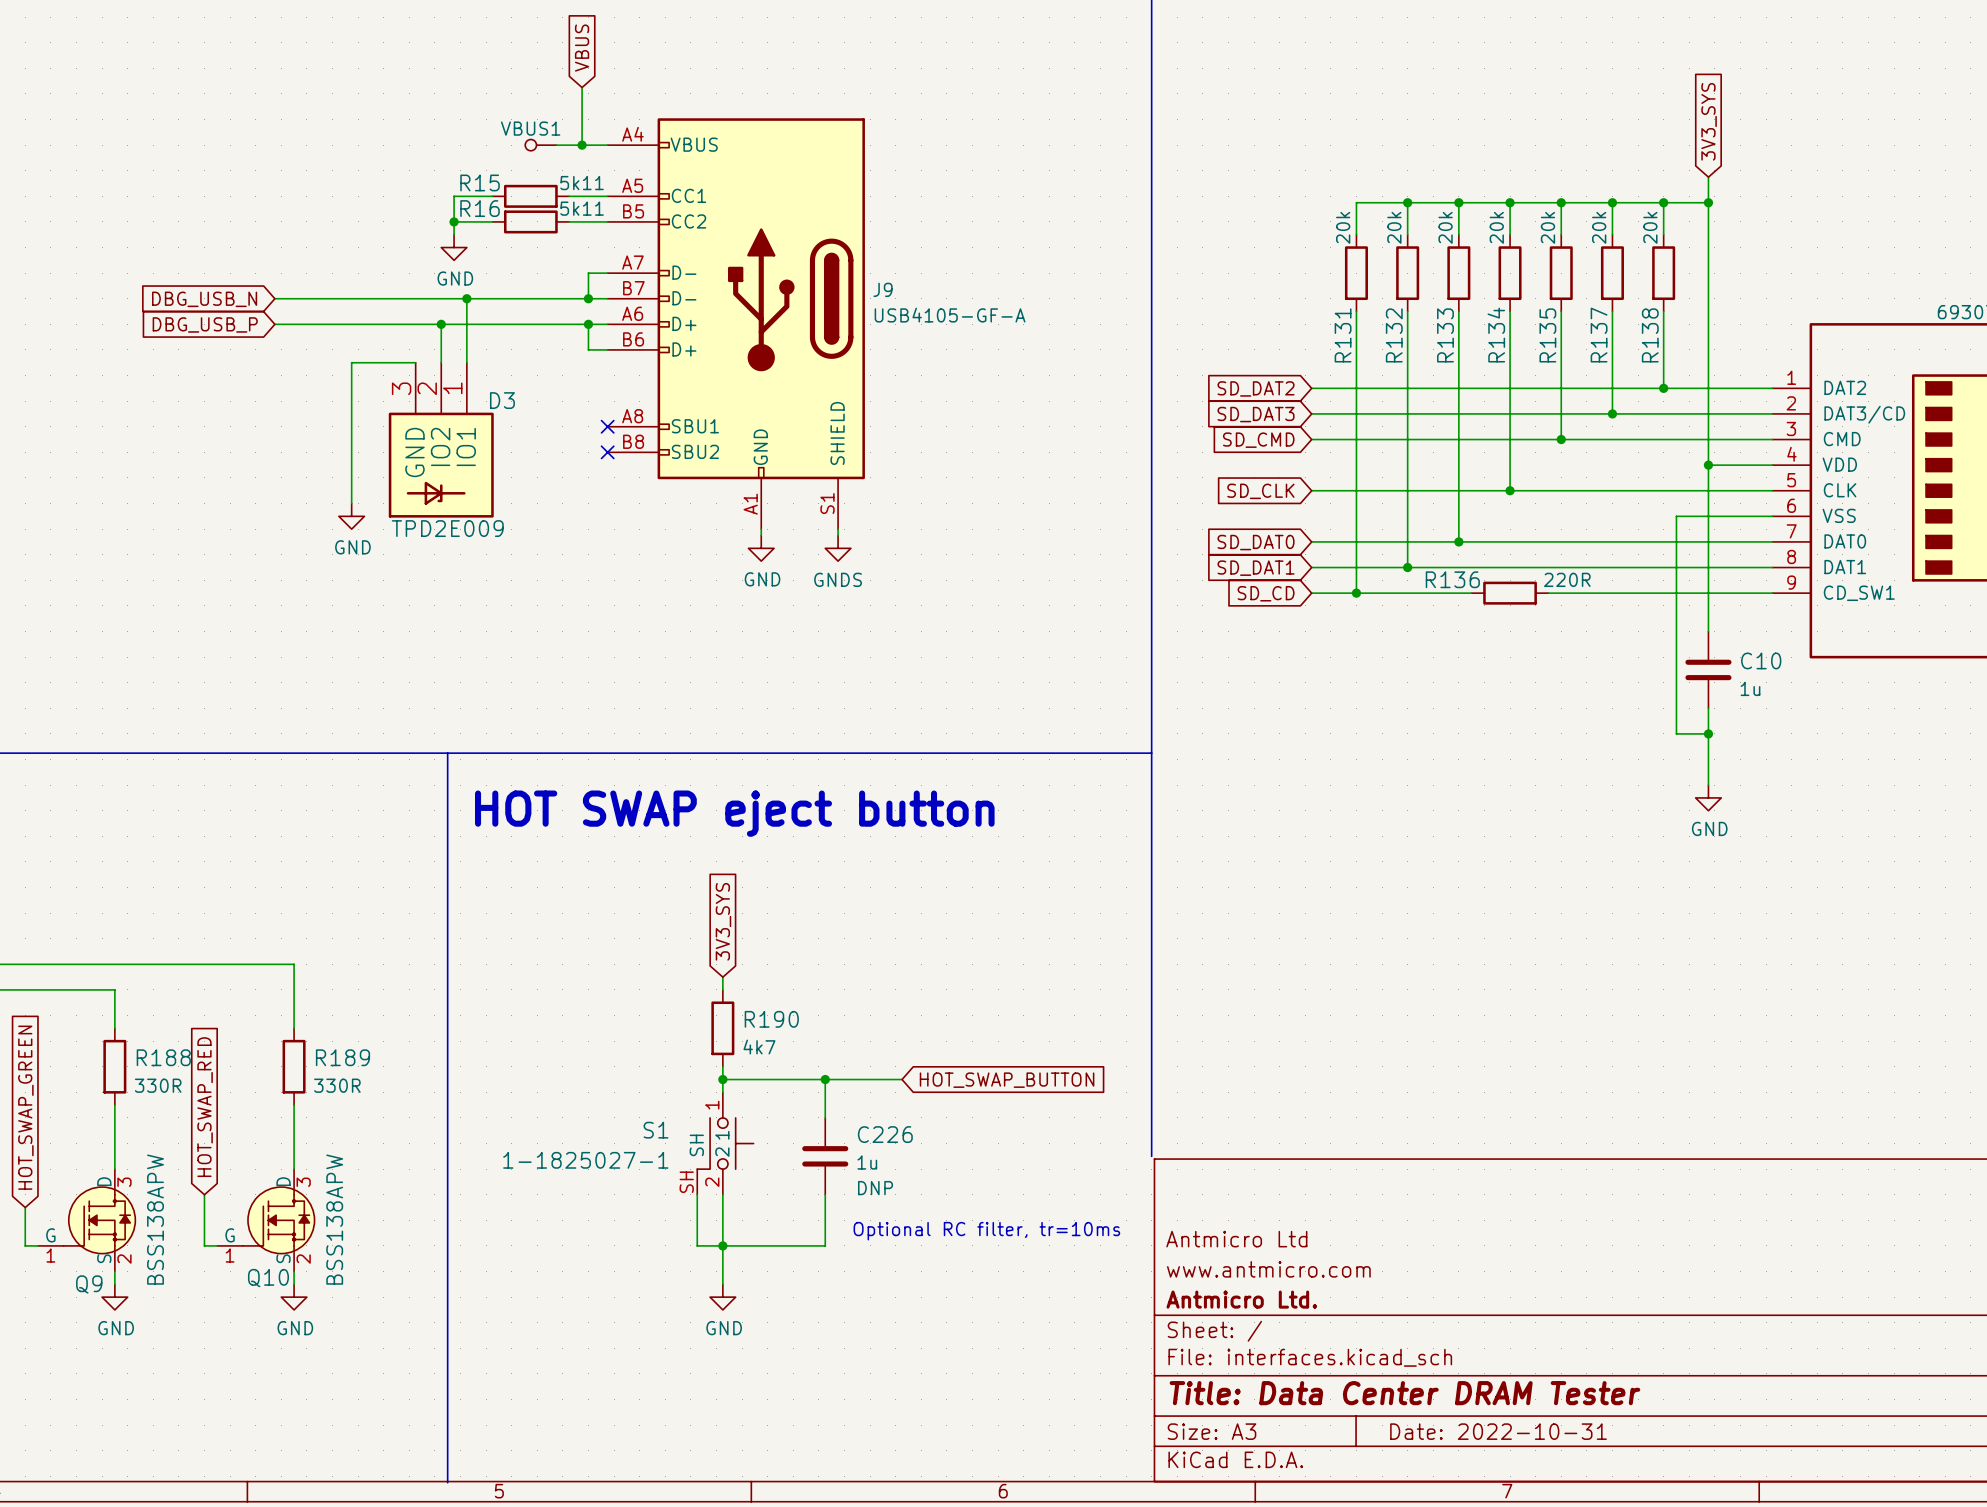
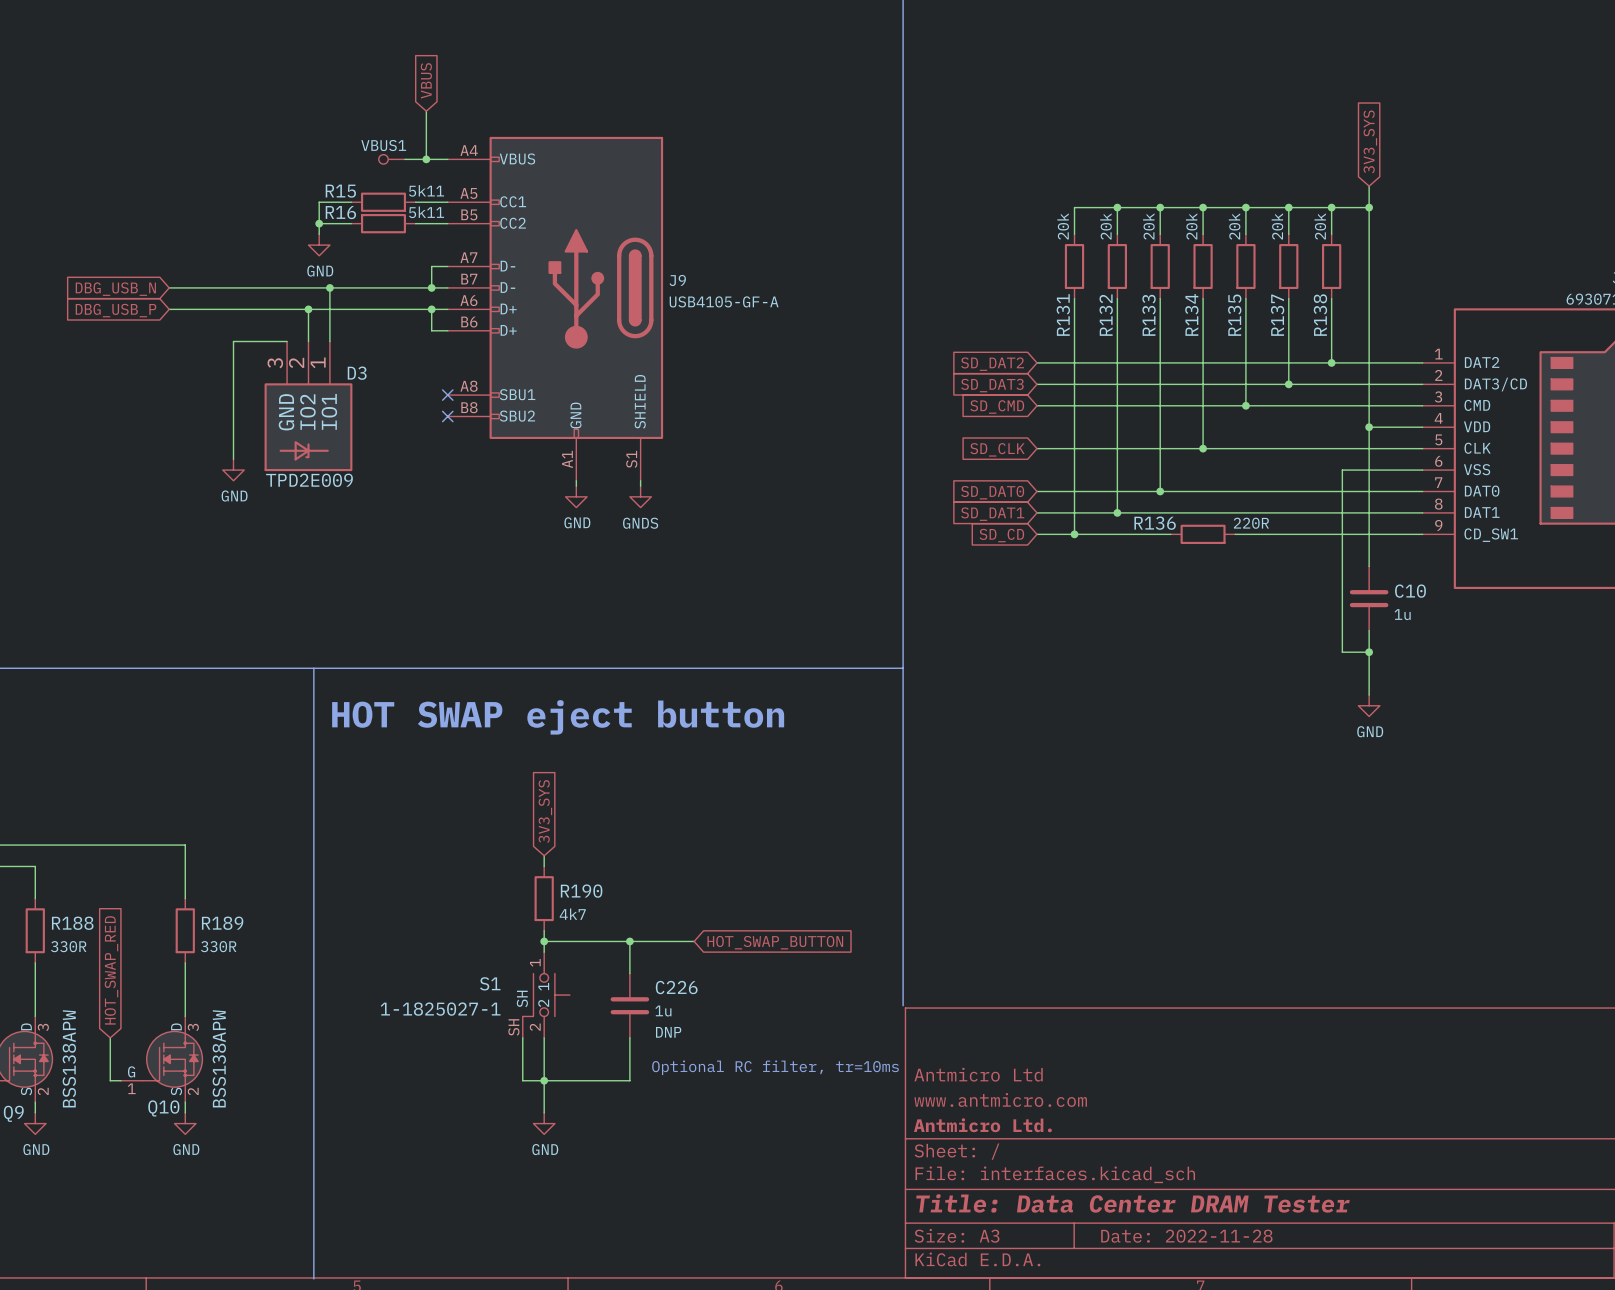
title block: Date: 2022-10-31 (1498, 1431) -> Date: 2022-11-28 (1186, 1236)

